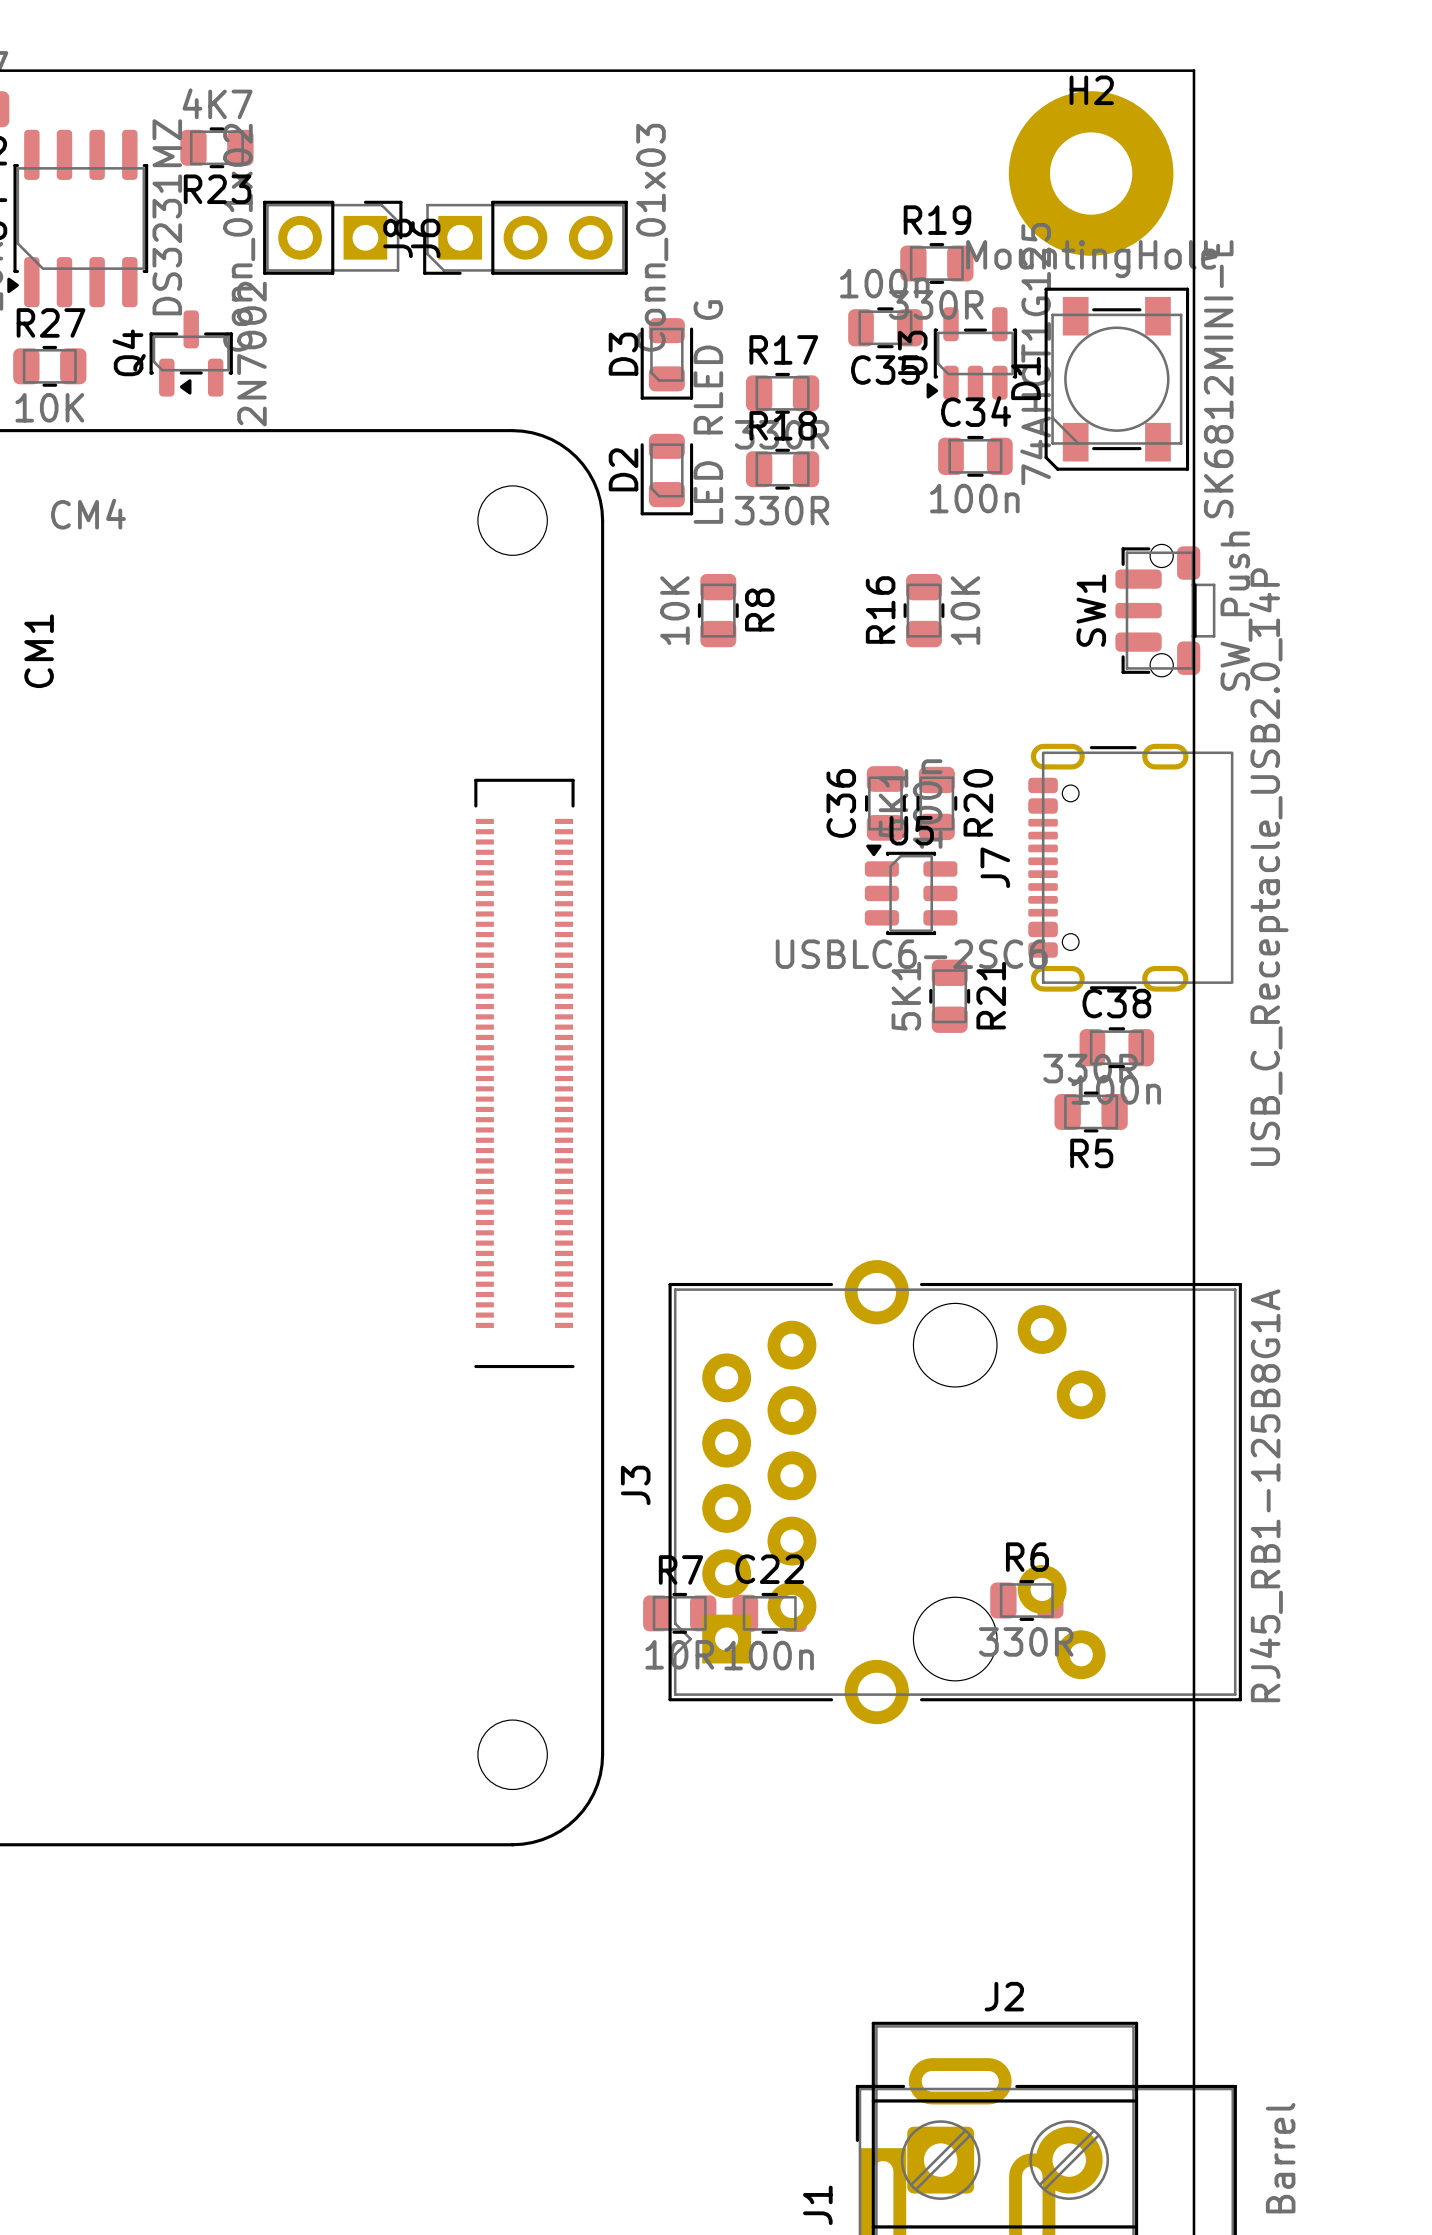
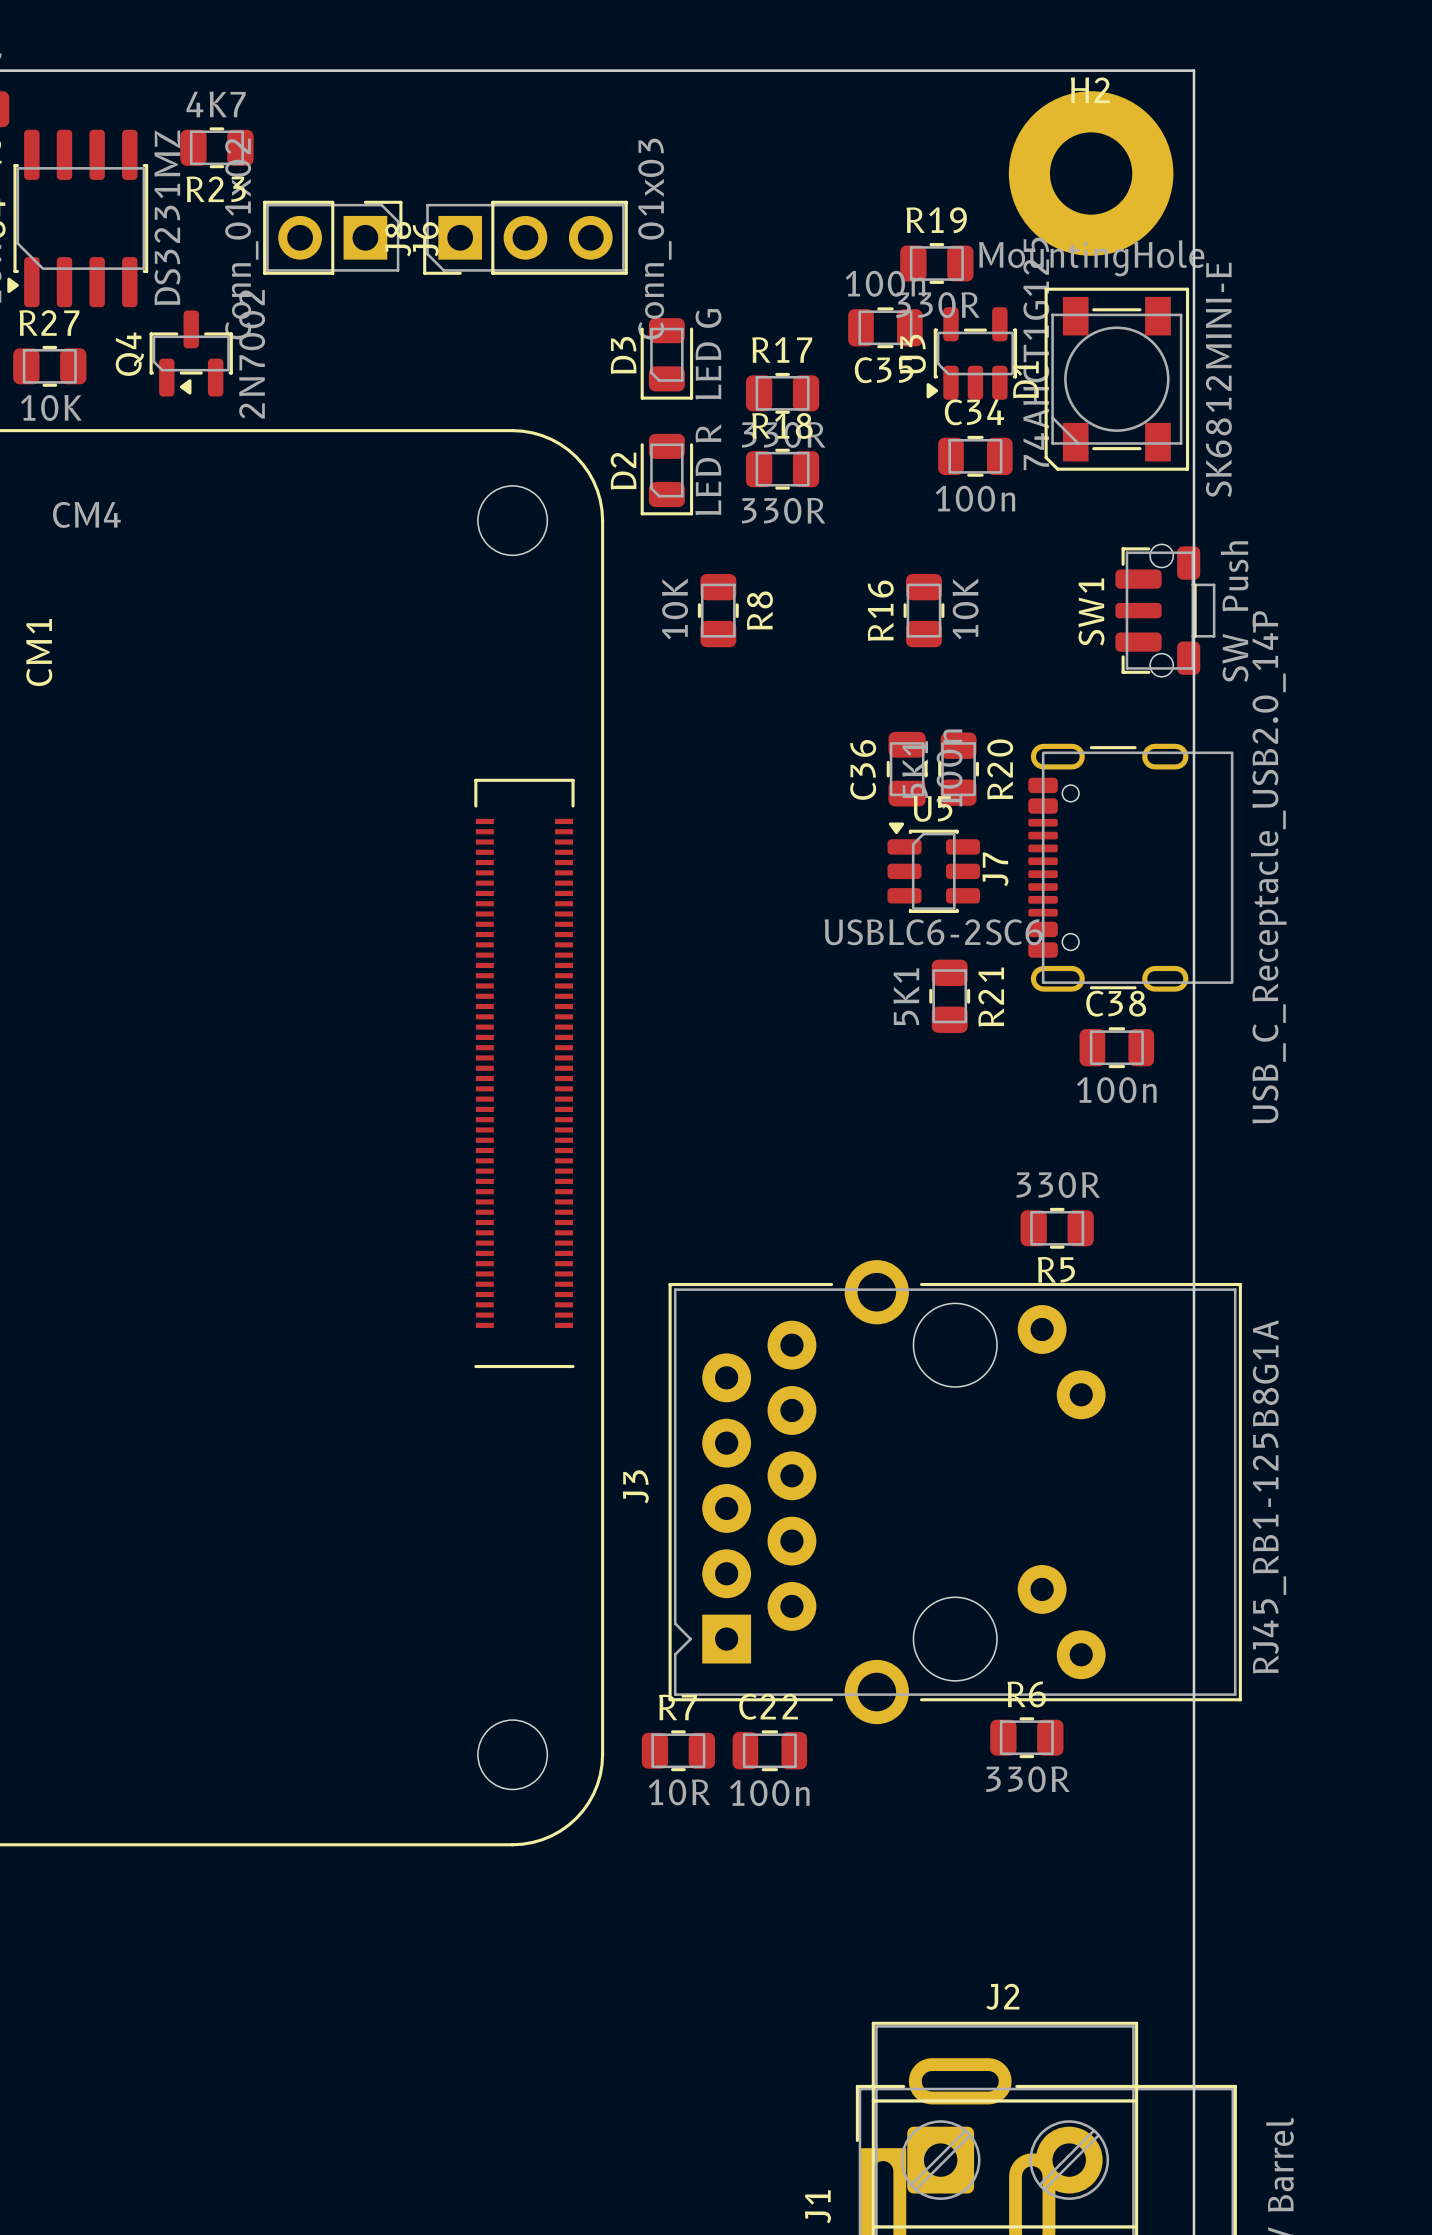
C36 position: (885, 803) -> (907, 769)
R20 position: (936, 803) -> (958, 769)
U5 position: (911, 889) -> (933, 867)
R5 position: (1091, 1111) -> (1057, 1228)
R6 position: (1026, 1600) -> (1026, 1737)
R7 position: (679, 1613) -> (678, 1750)
C22 position: (769, 1613) -> (769, 1750)

